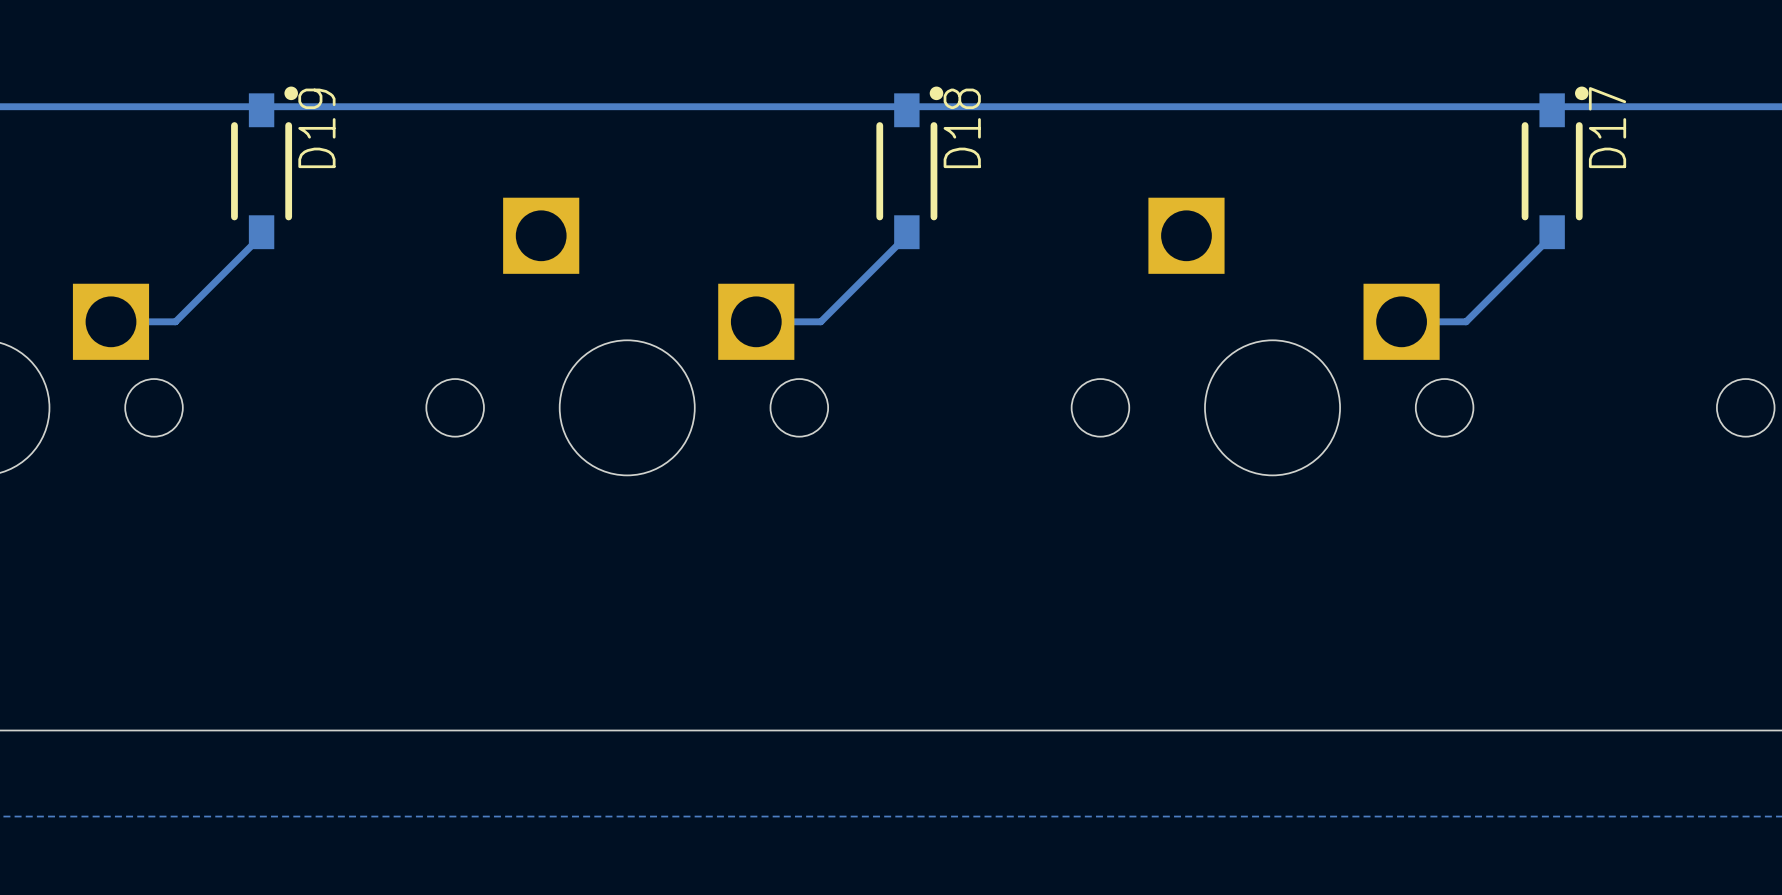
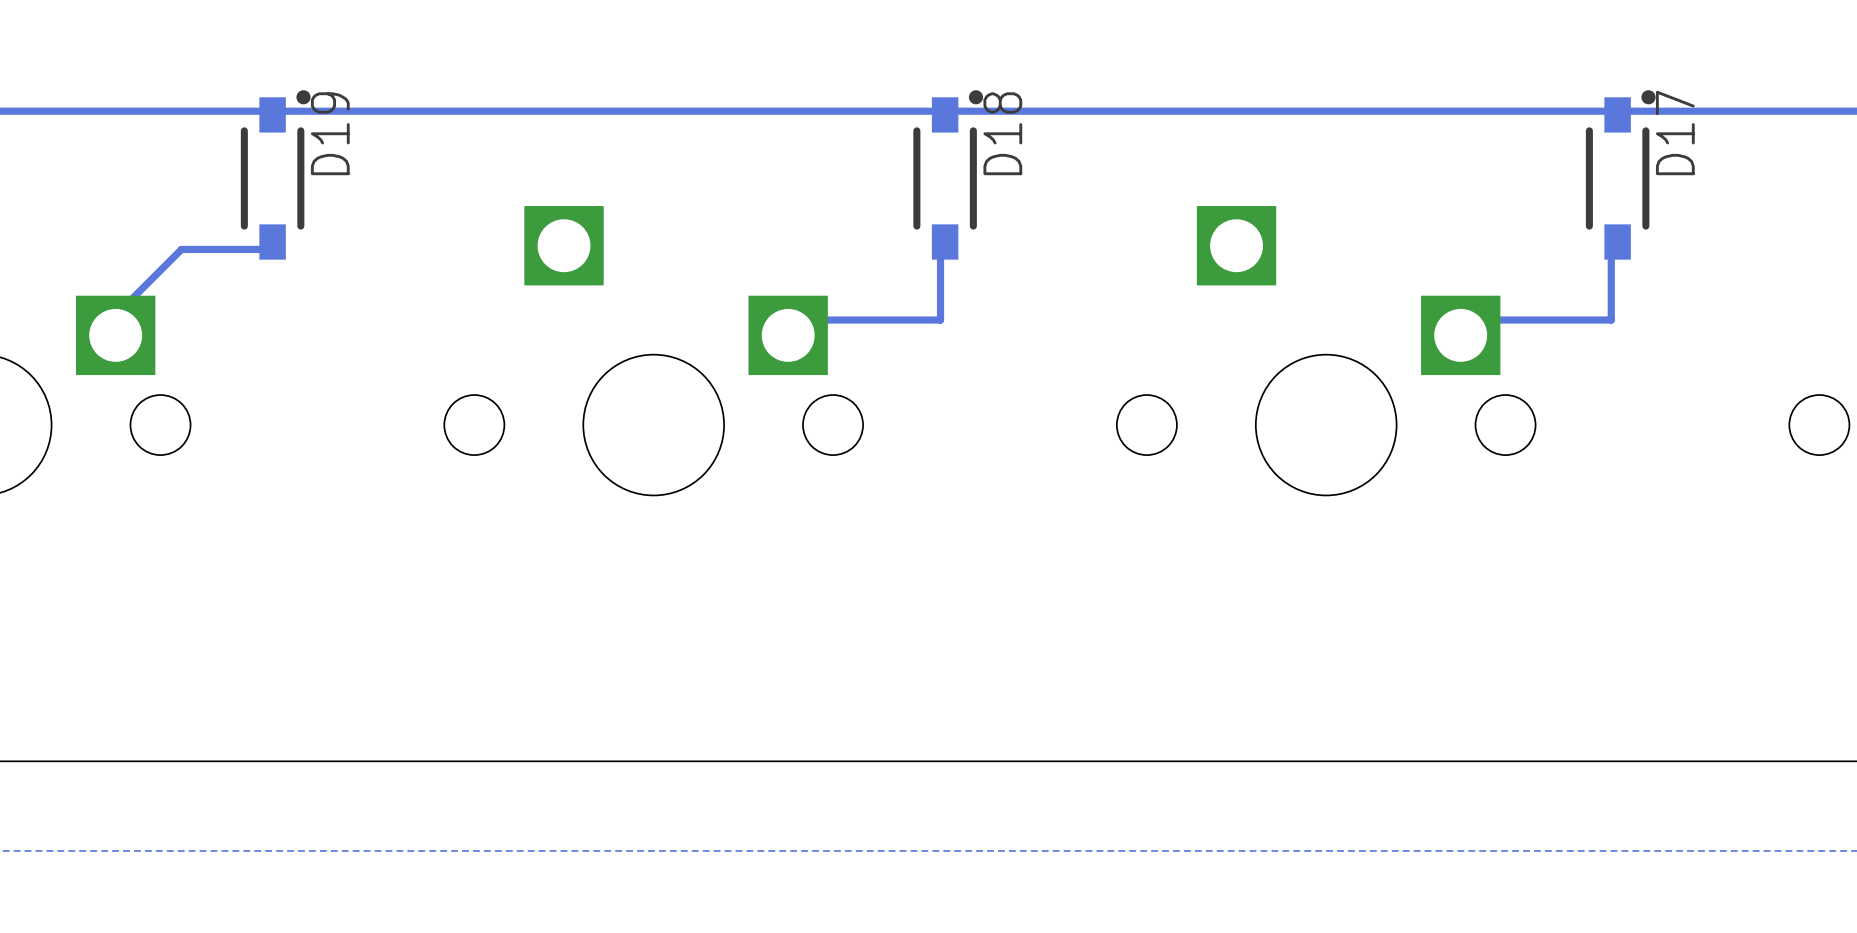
track: (261, 232) (261, 235) (175, 321) (111, 321) -> (272, 242) (269, 249) (181, 249) (110, 320) (115, 335)
track: (906, 232) (906, 235) (820, 321) (756, 321) -> (945, 242) (940, 249) (940, 320) (799, 320) (788, 335)
track: (1552, 232) (1552, 235) (1466, 321) (1401, 321) -> (1617, 242) (1611, 249) (1611, 320) (1470, 320) (1460, 335)

